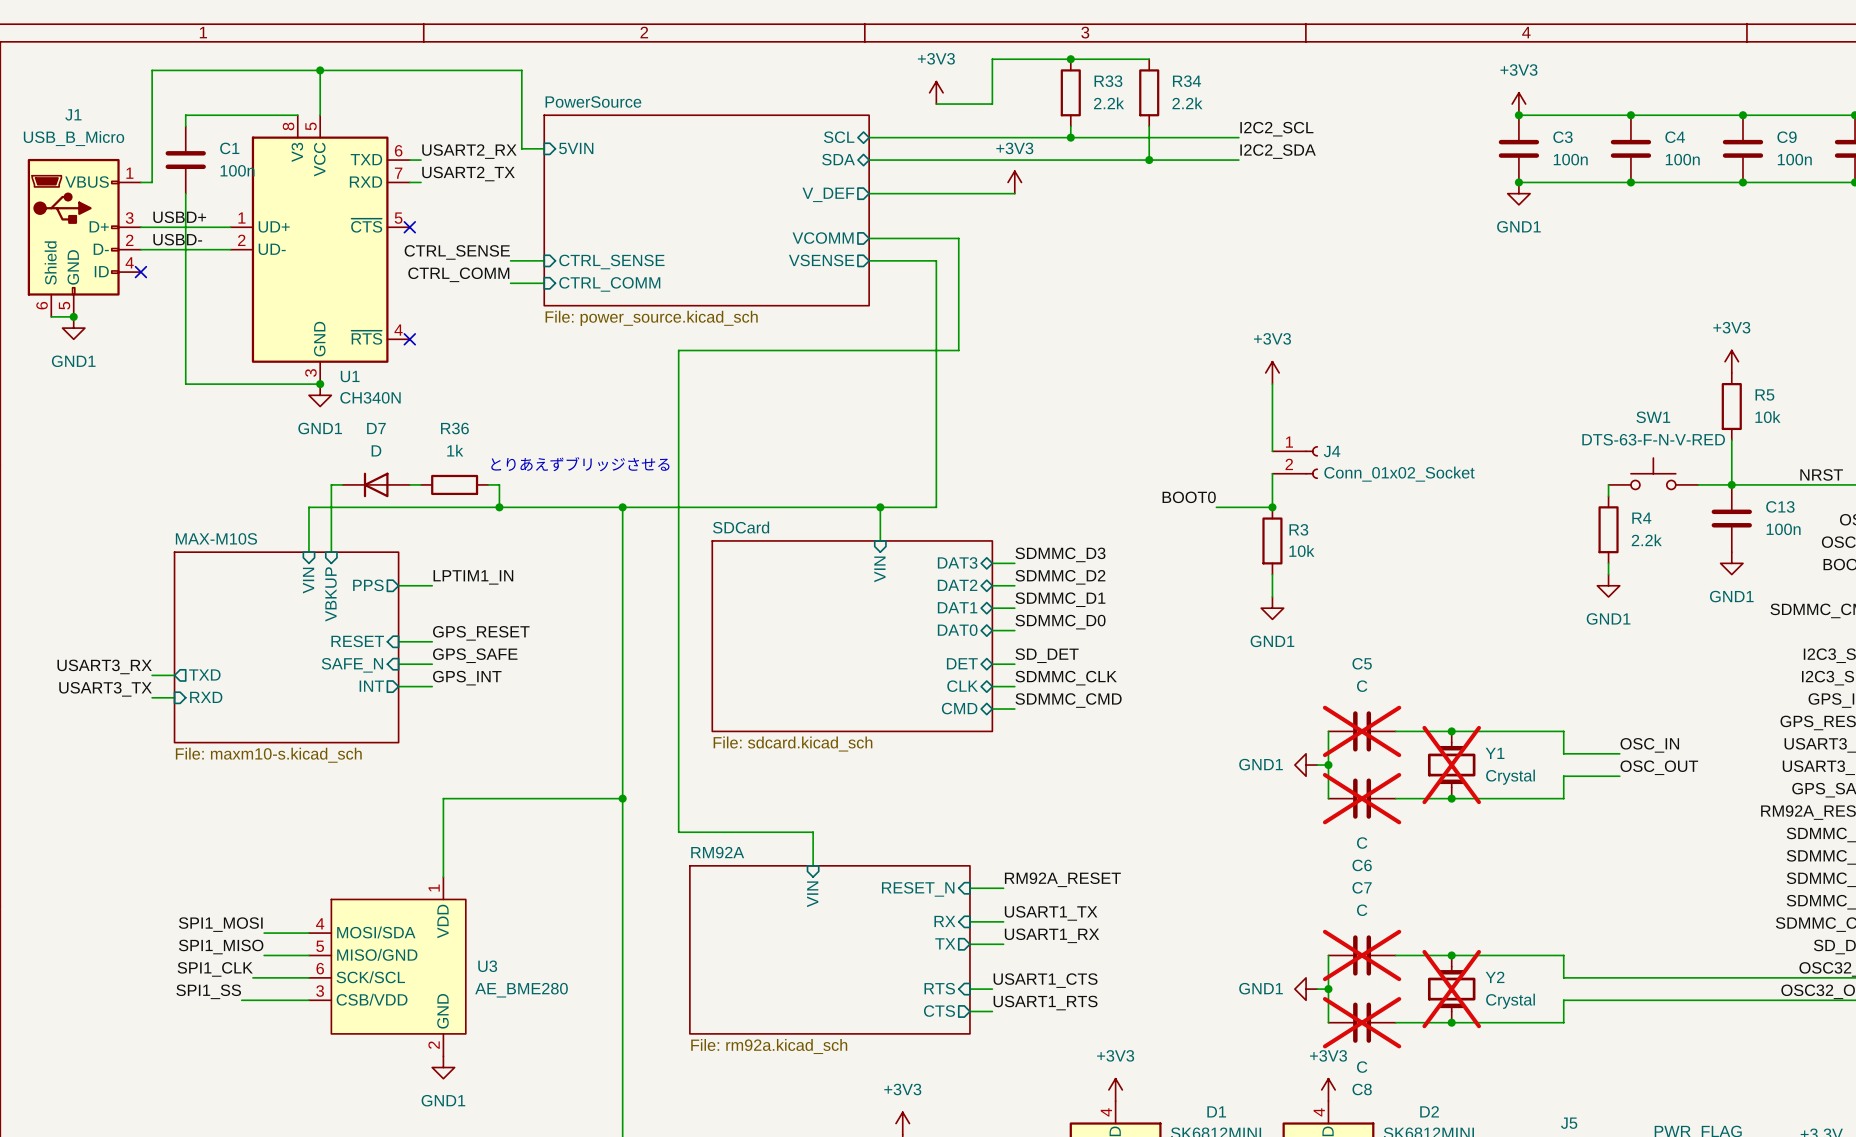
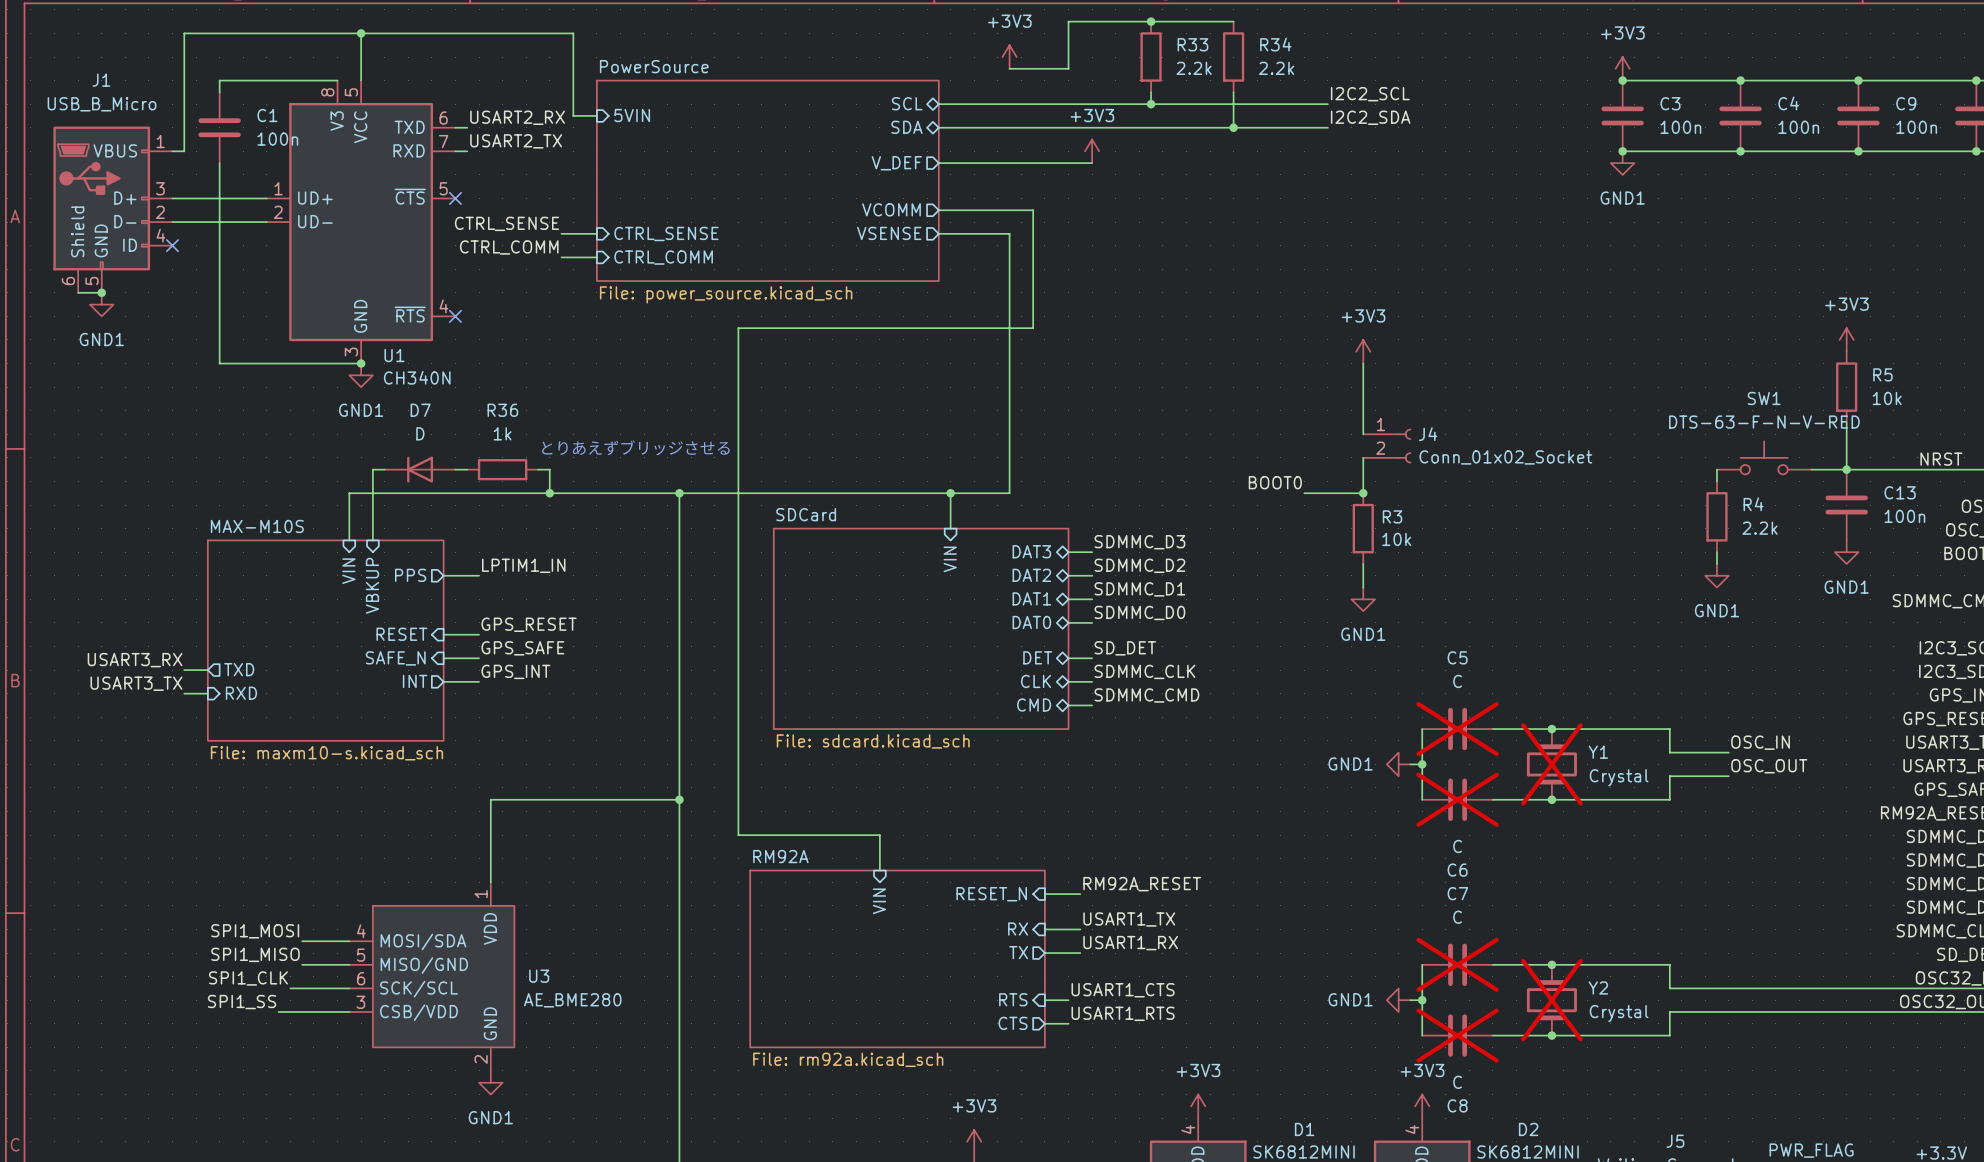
label: USBD+ (179, 217) -> none
label: USBD- (177, 239) -> none

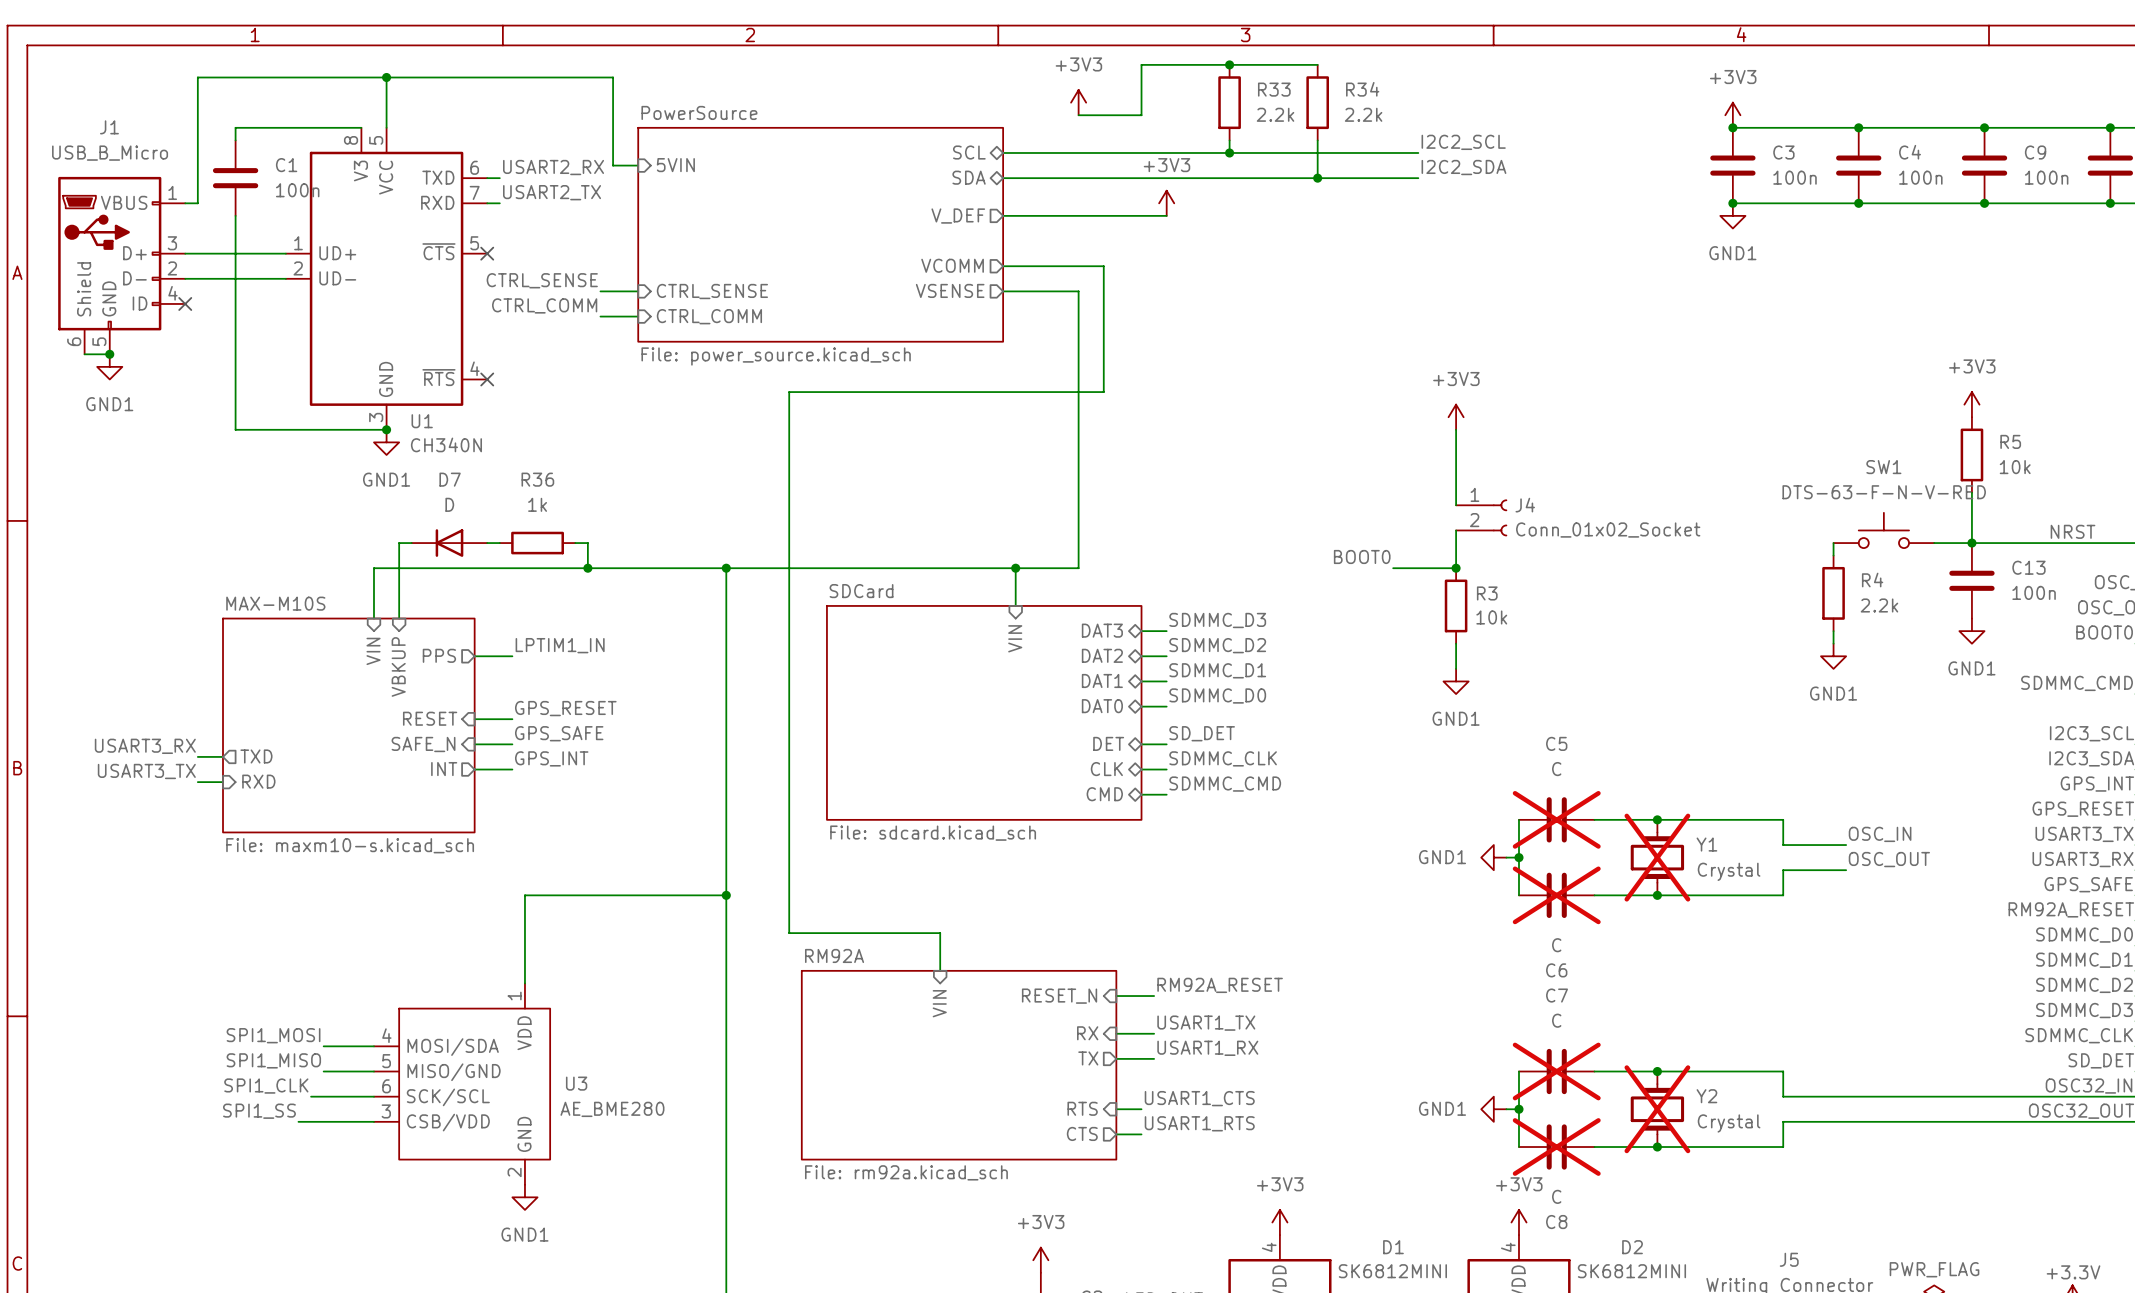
text: とりあえずブリッジさせる (635, 447) -> none

